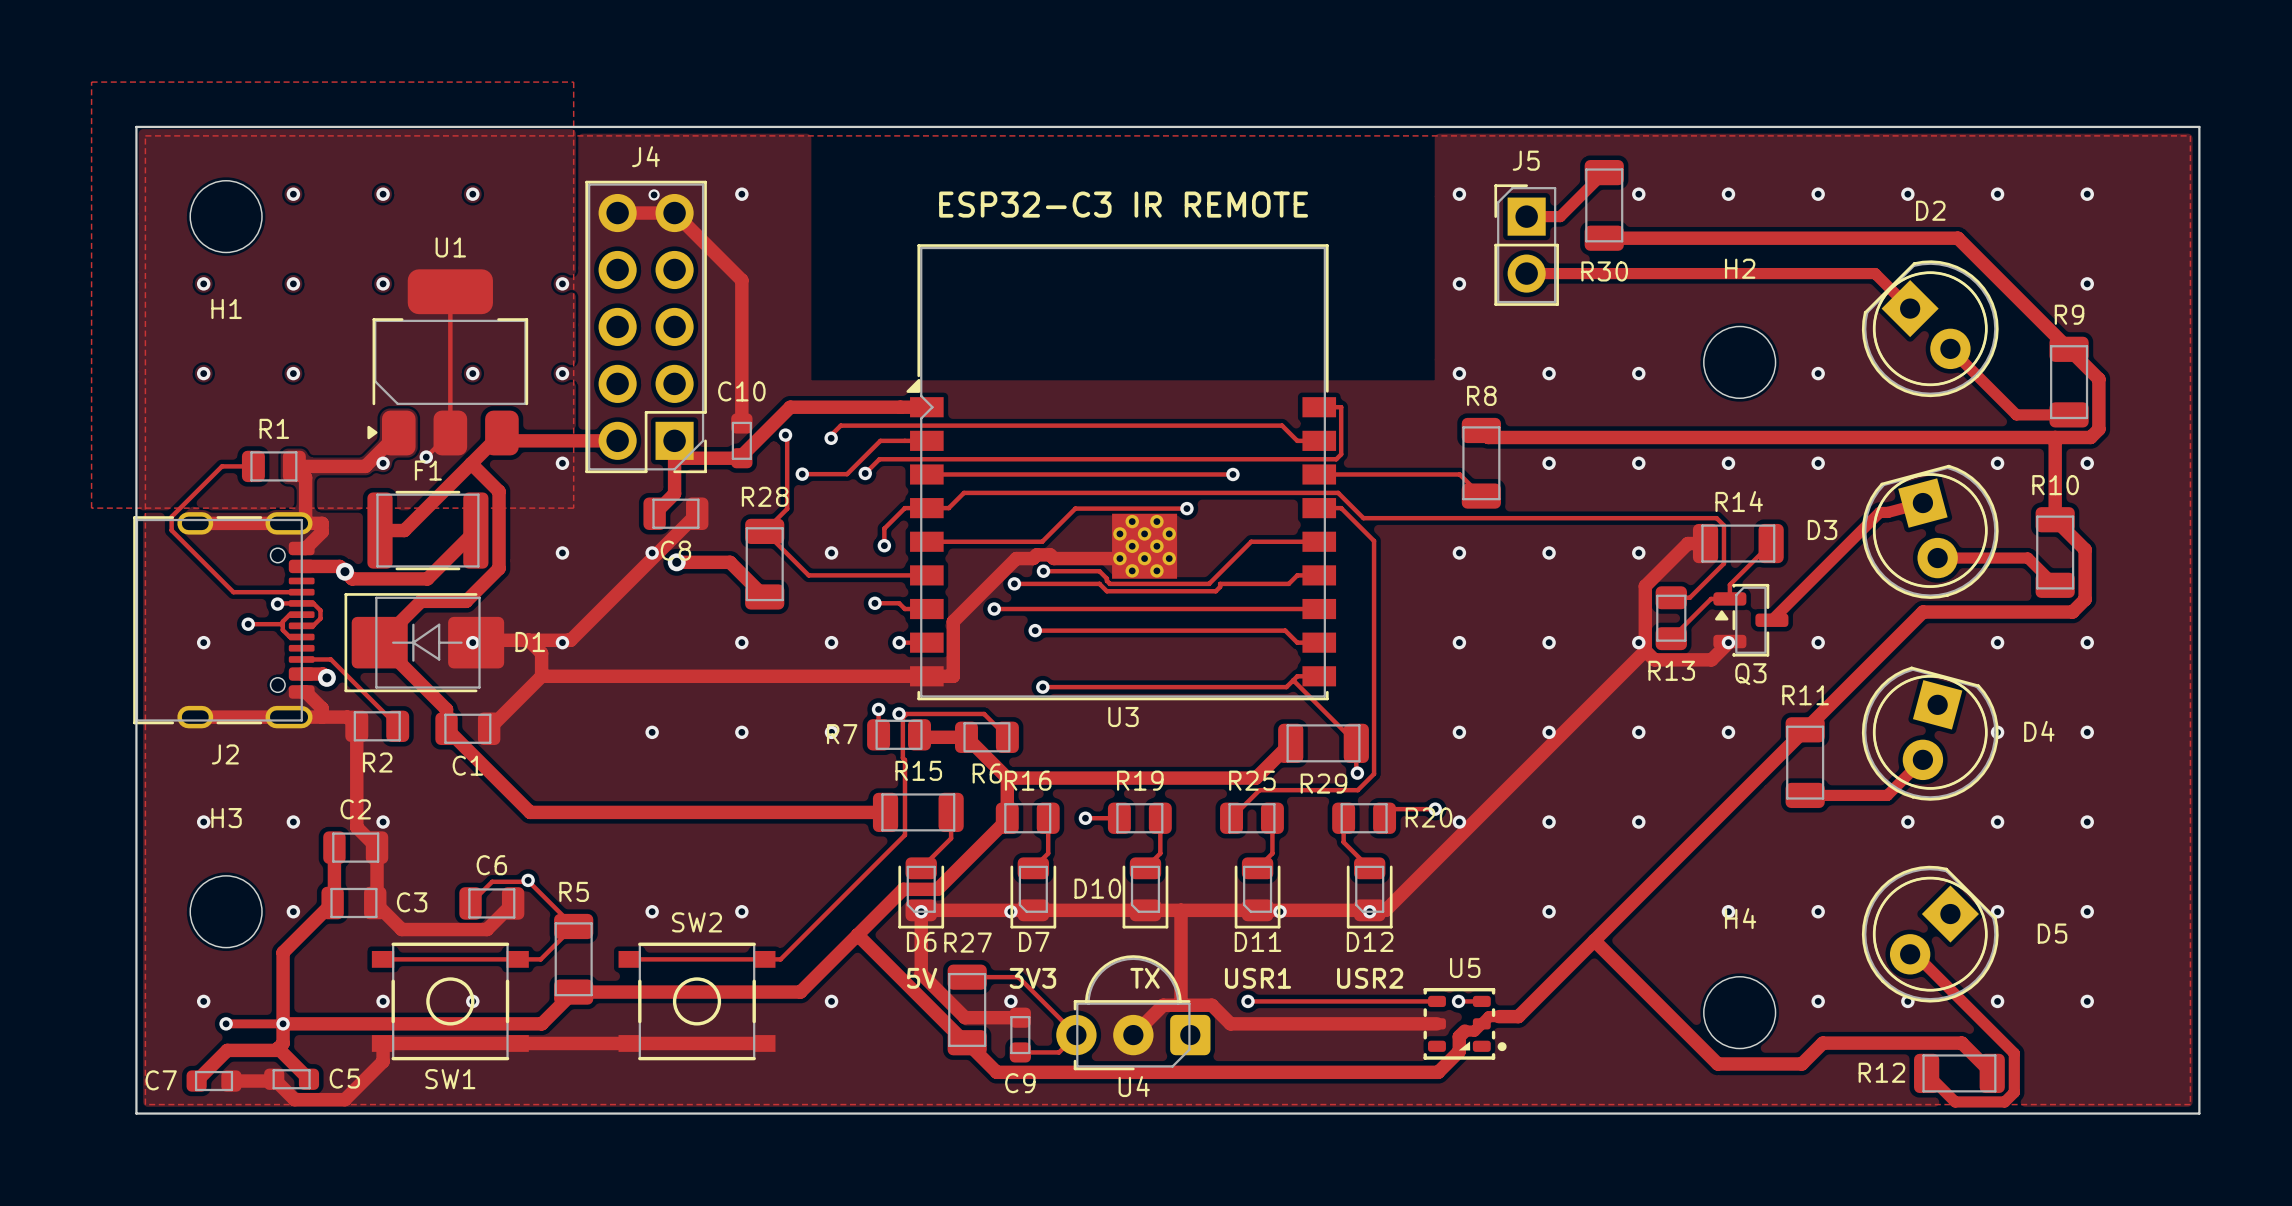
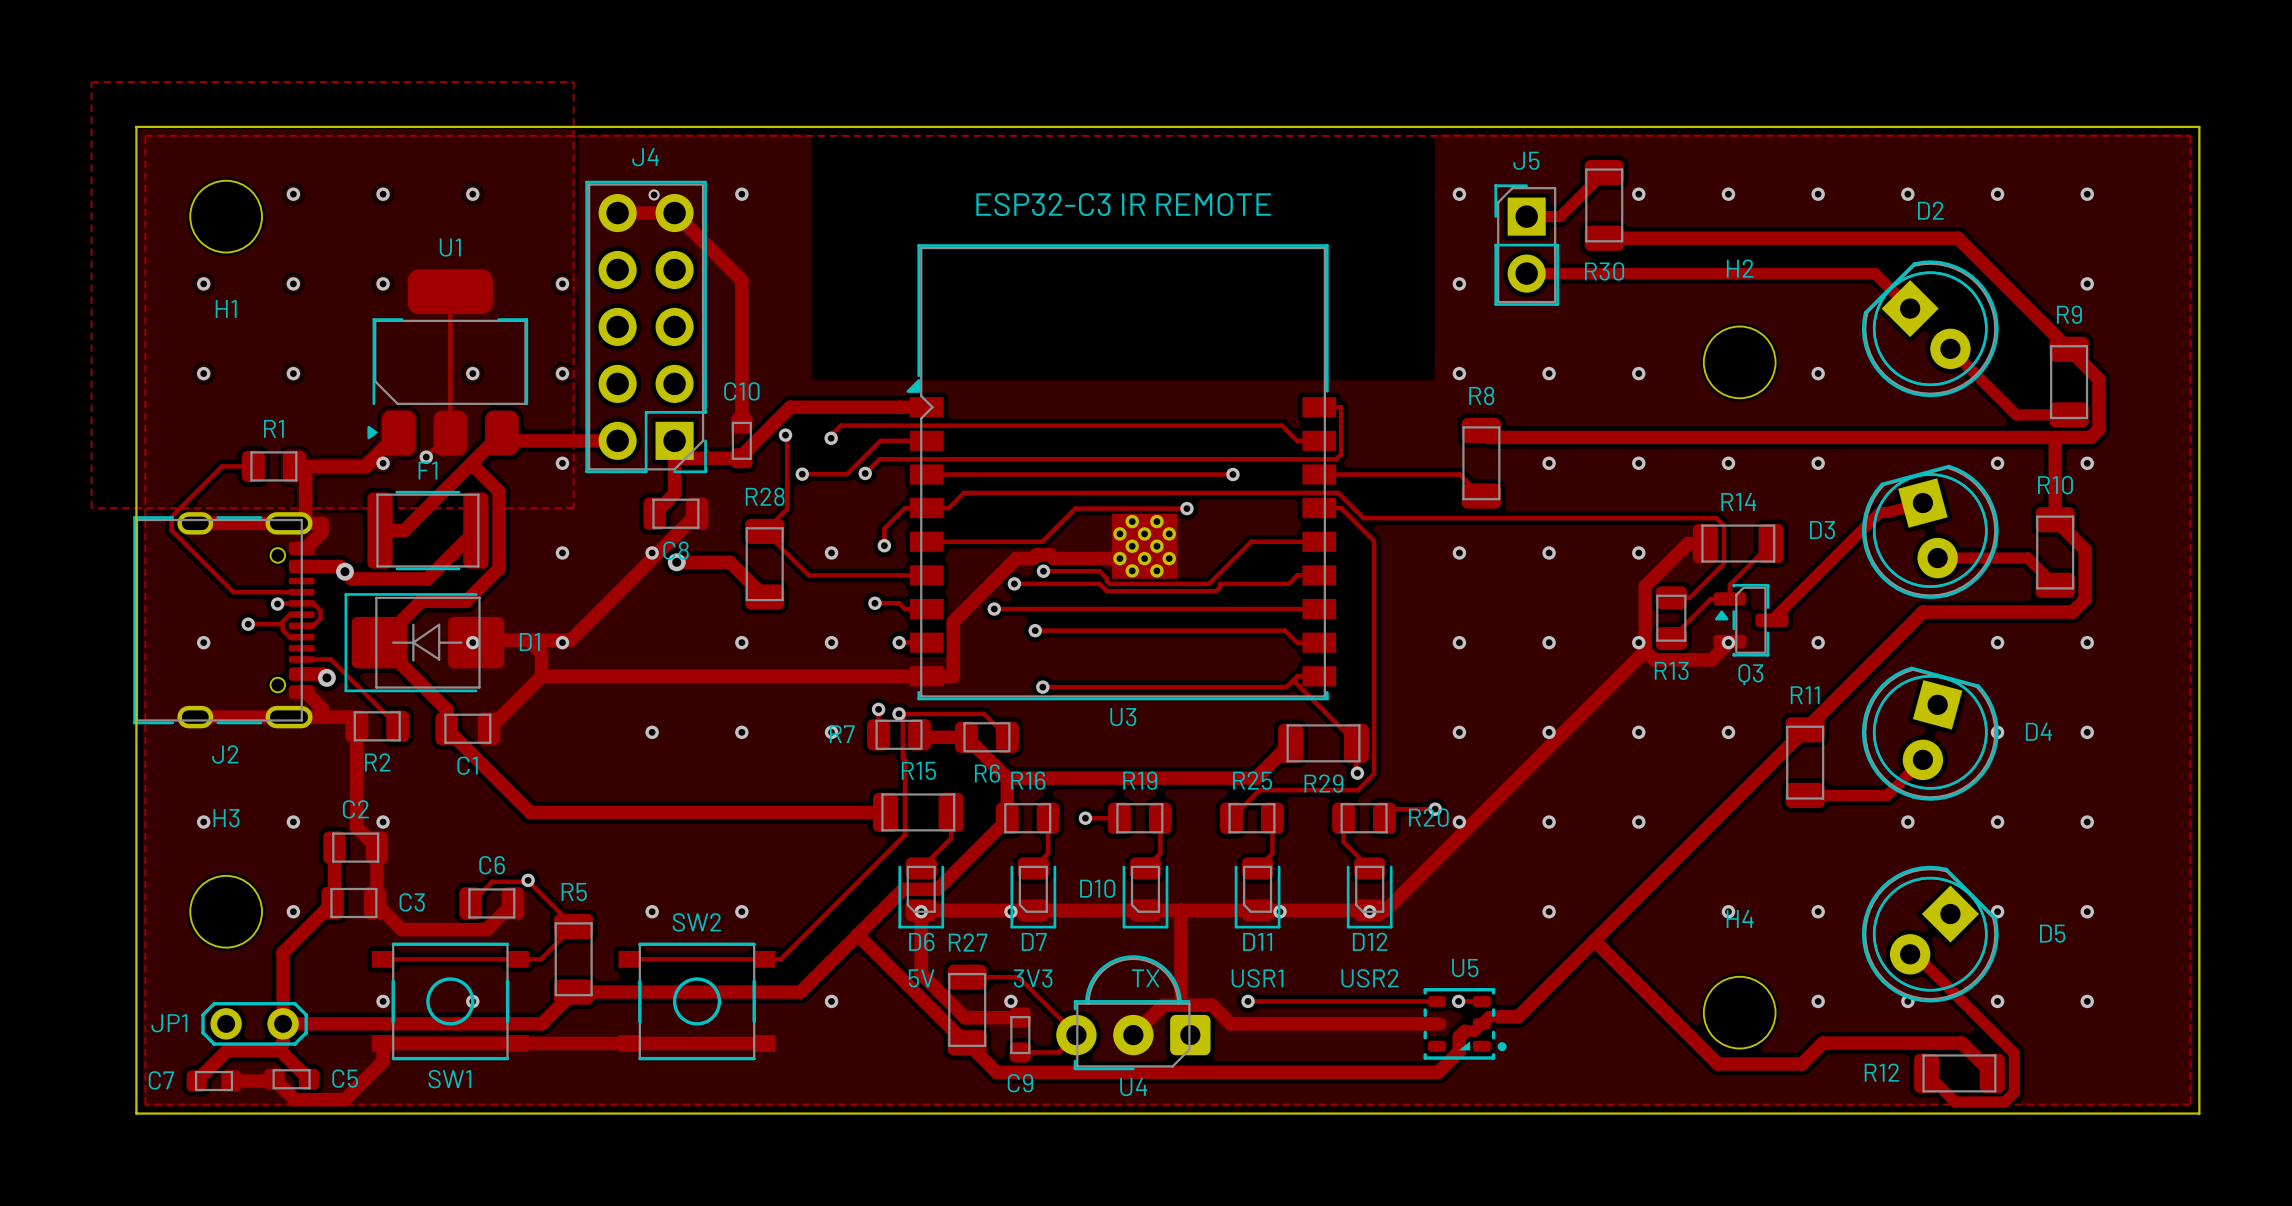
via: (203, 1001) -> none
track: (226, 1023) (283, 1023) -> none
via: (226, 1023) -> none
JP1: none -> (254, 1023)
via: (283, 1023) -> none

